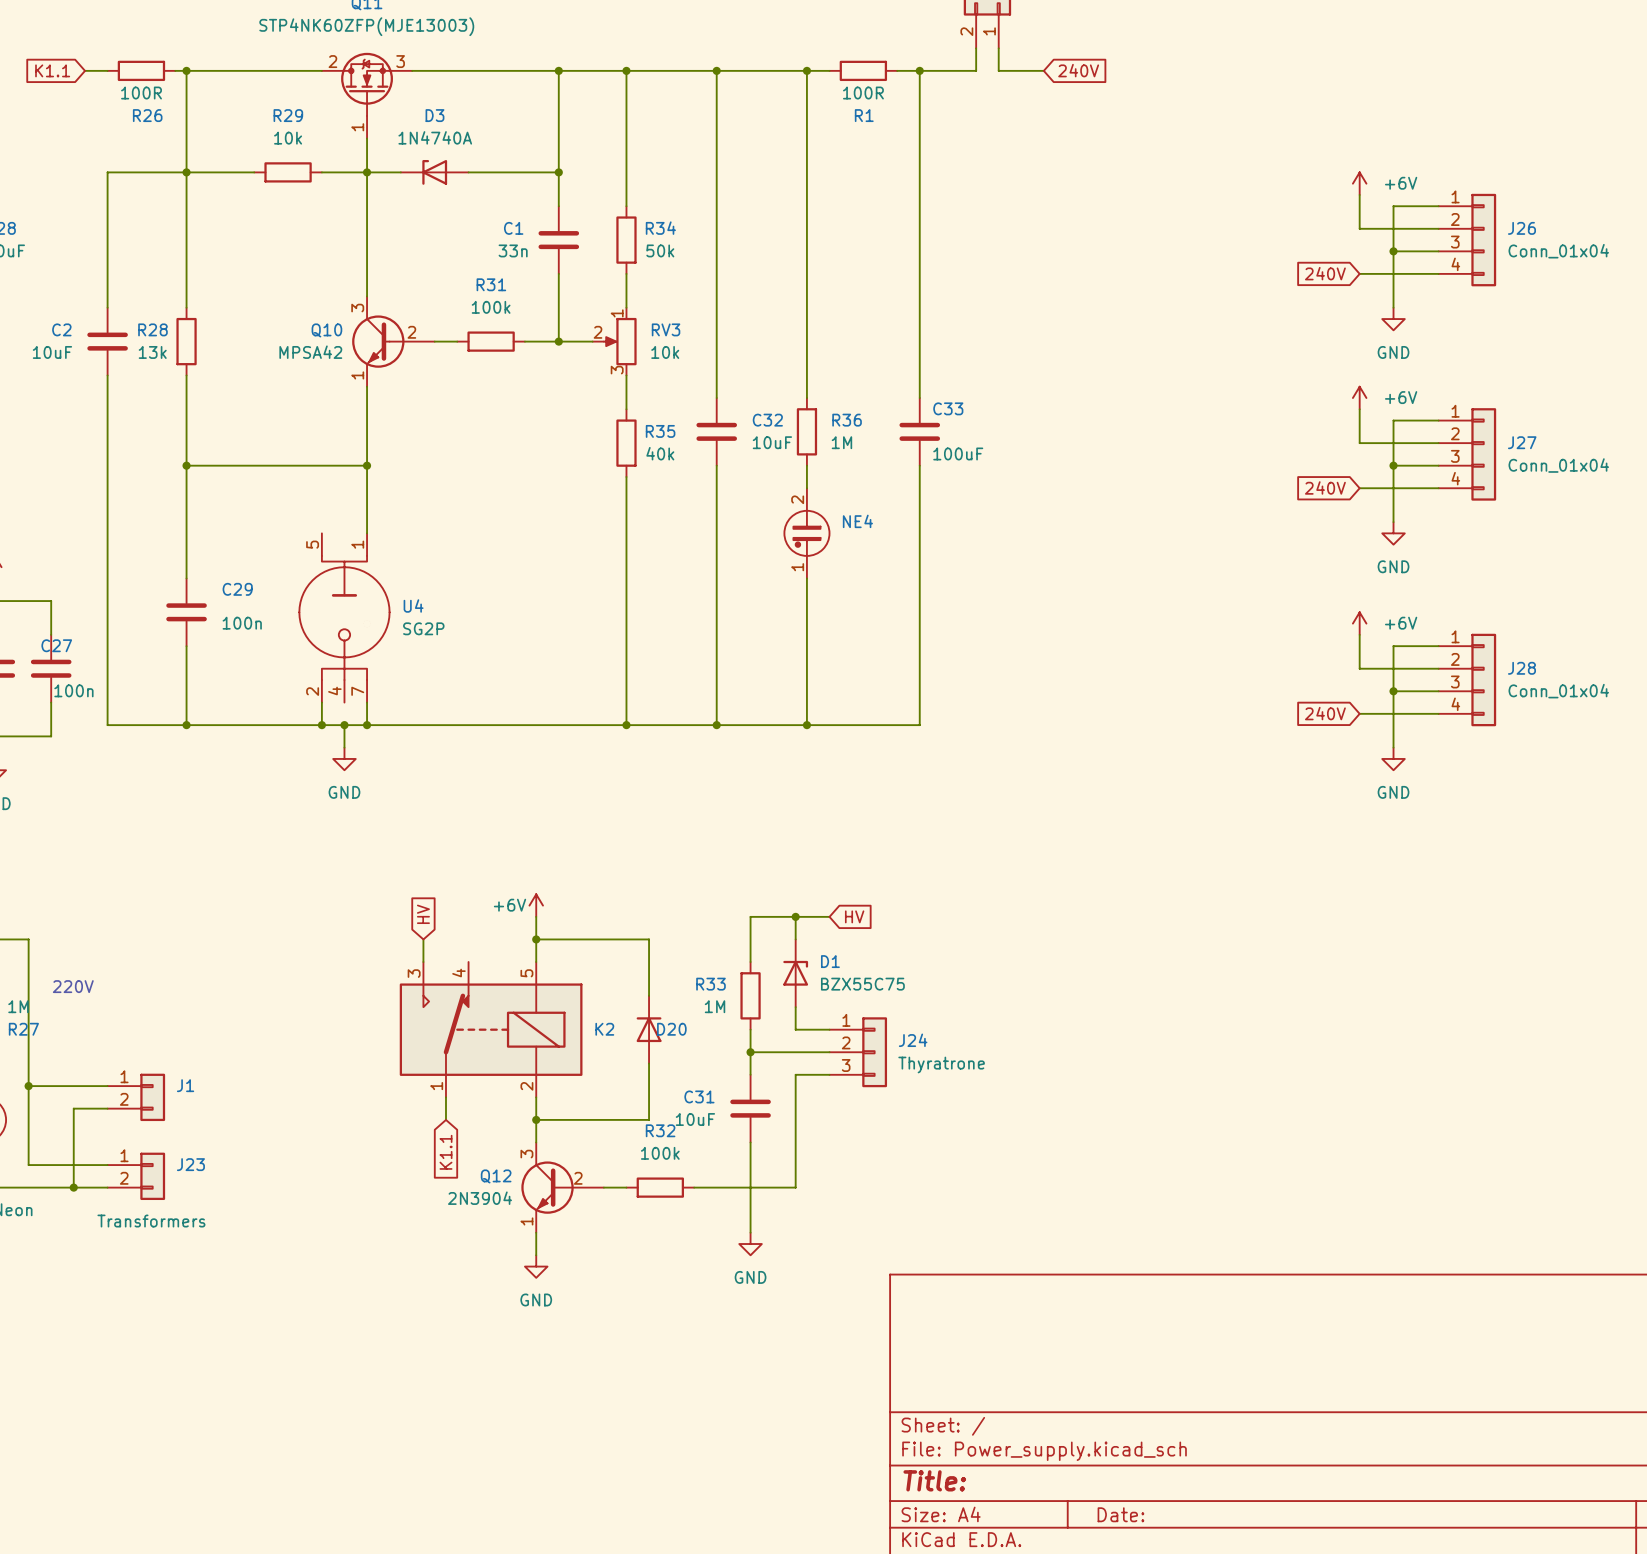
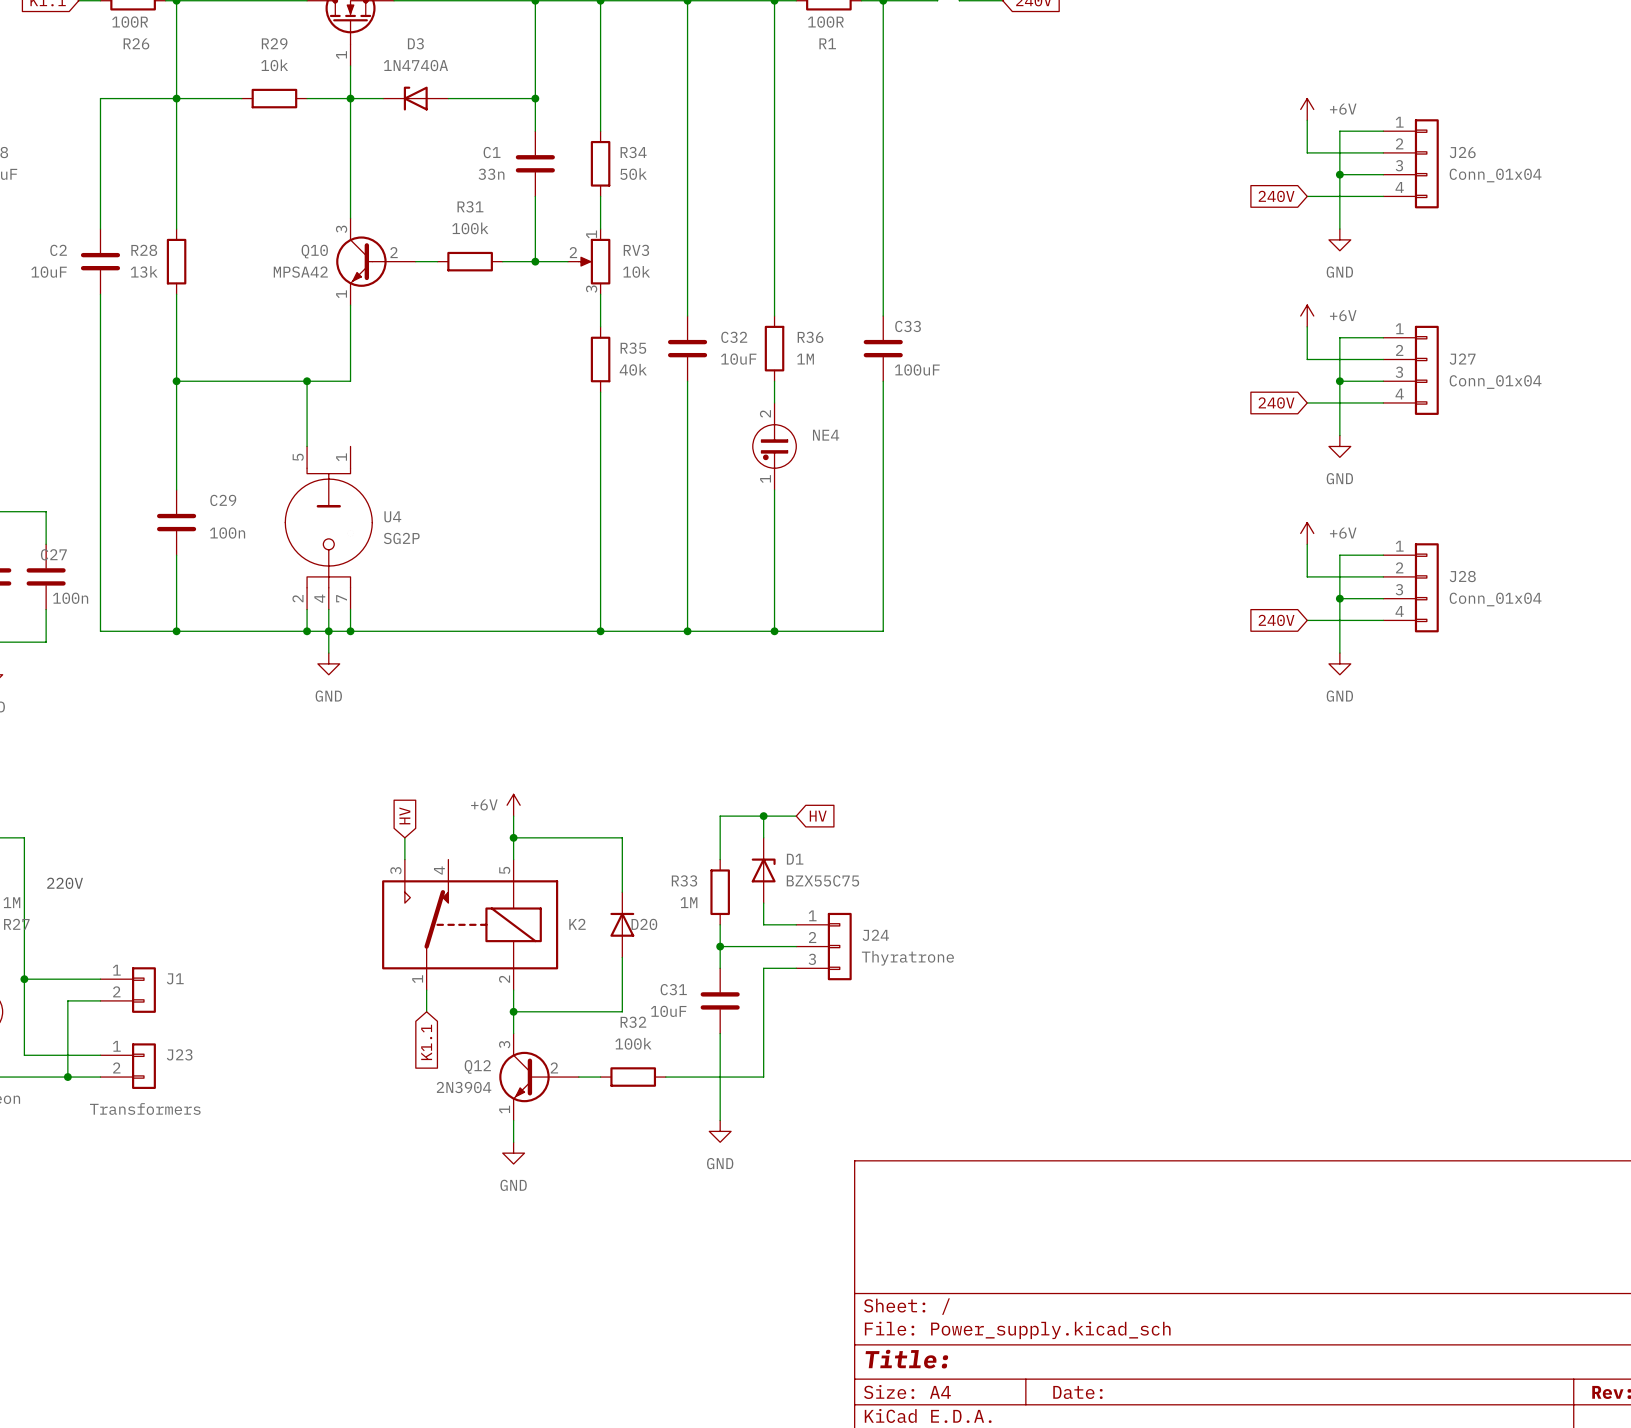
wire: (367, 465) (367, 533) -> (307, 381) (307, 446)
junction position: (367, 465) -> (307, 381)
wire: none -> (328, 609) (328, 631)

